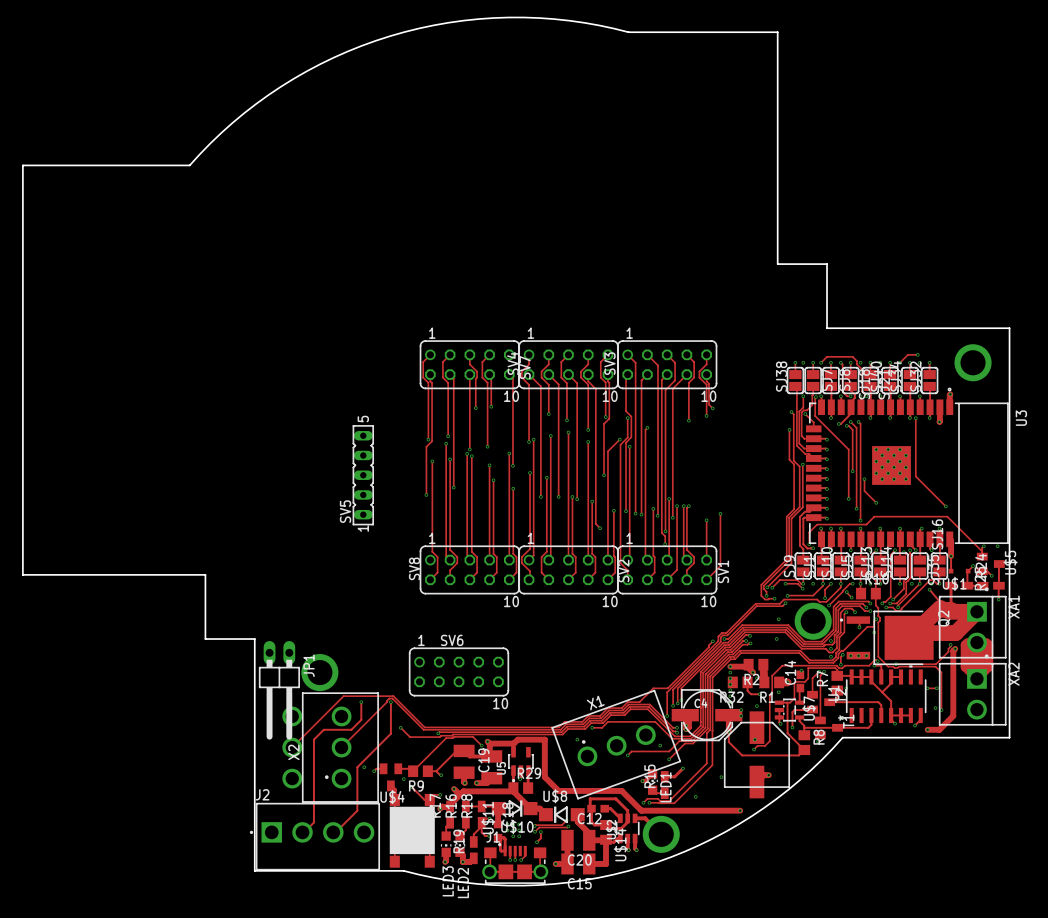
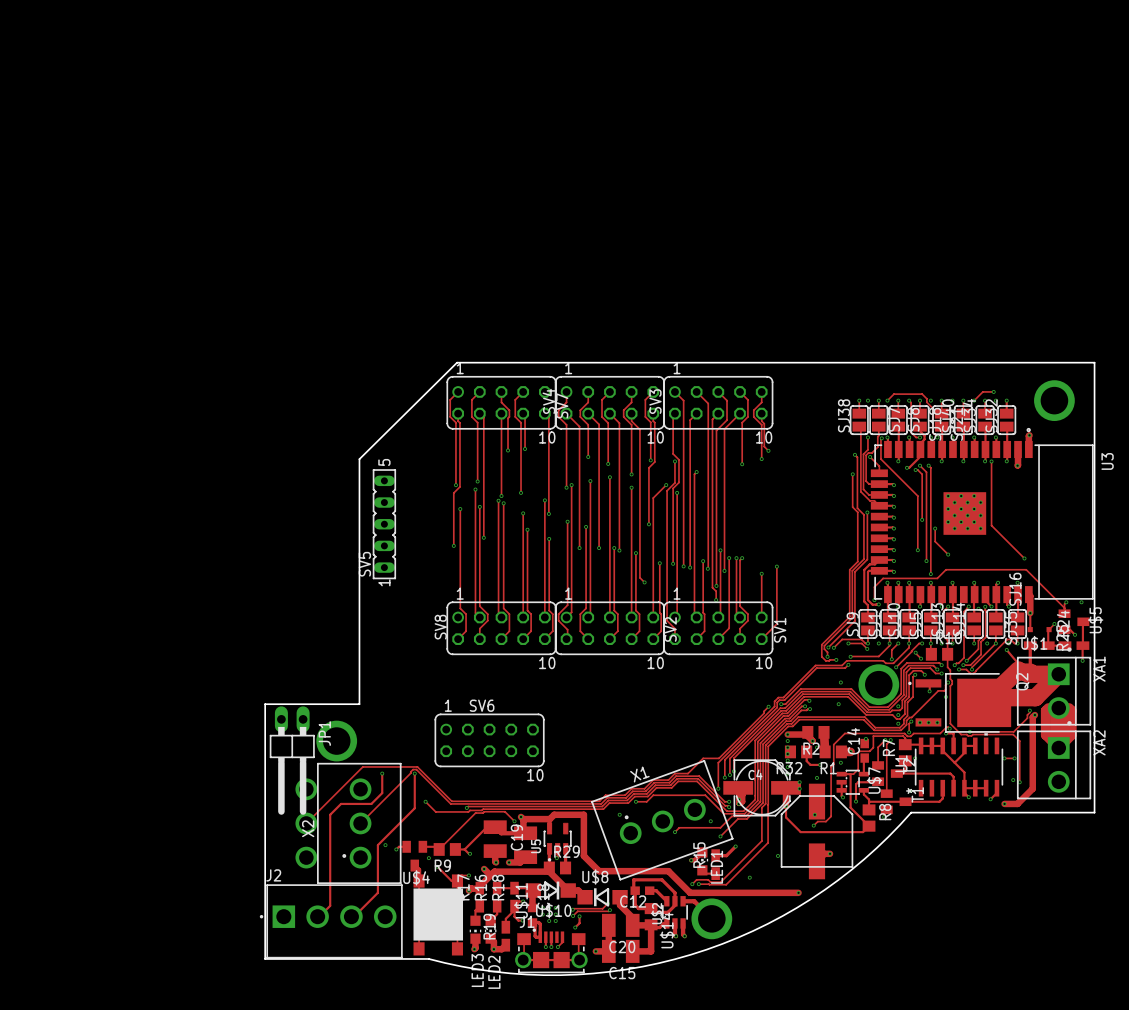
board edge: (827, 328) (827, 264) (777, 264) (777, 32) (628, 32) (569, 20) (524, 17) (478, 19) (434, 25) (390, 36) (361, 45) (333, 57) (293, 78) (256, 103) (232, 122) (189, 165) (22, 165) (22, 574) (205, 574) (205, 639) (254, 639) -> (893, 362) (457, 362) (359, 459) (359, 704) (265, 704)

